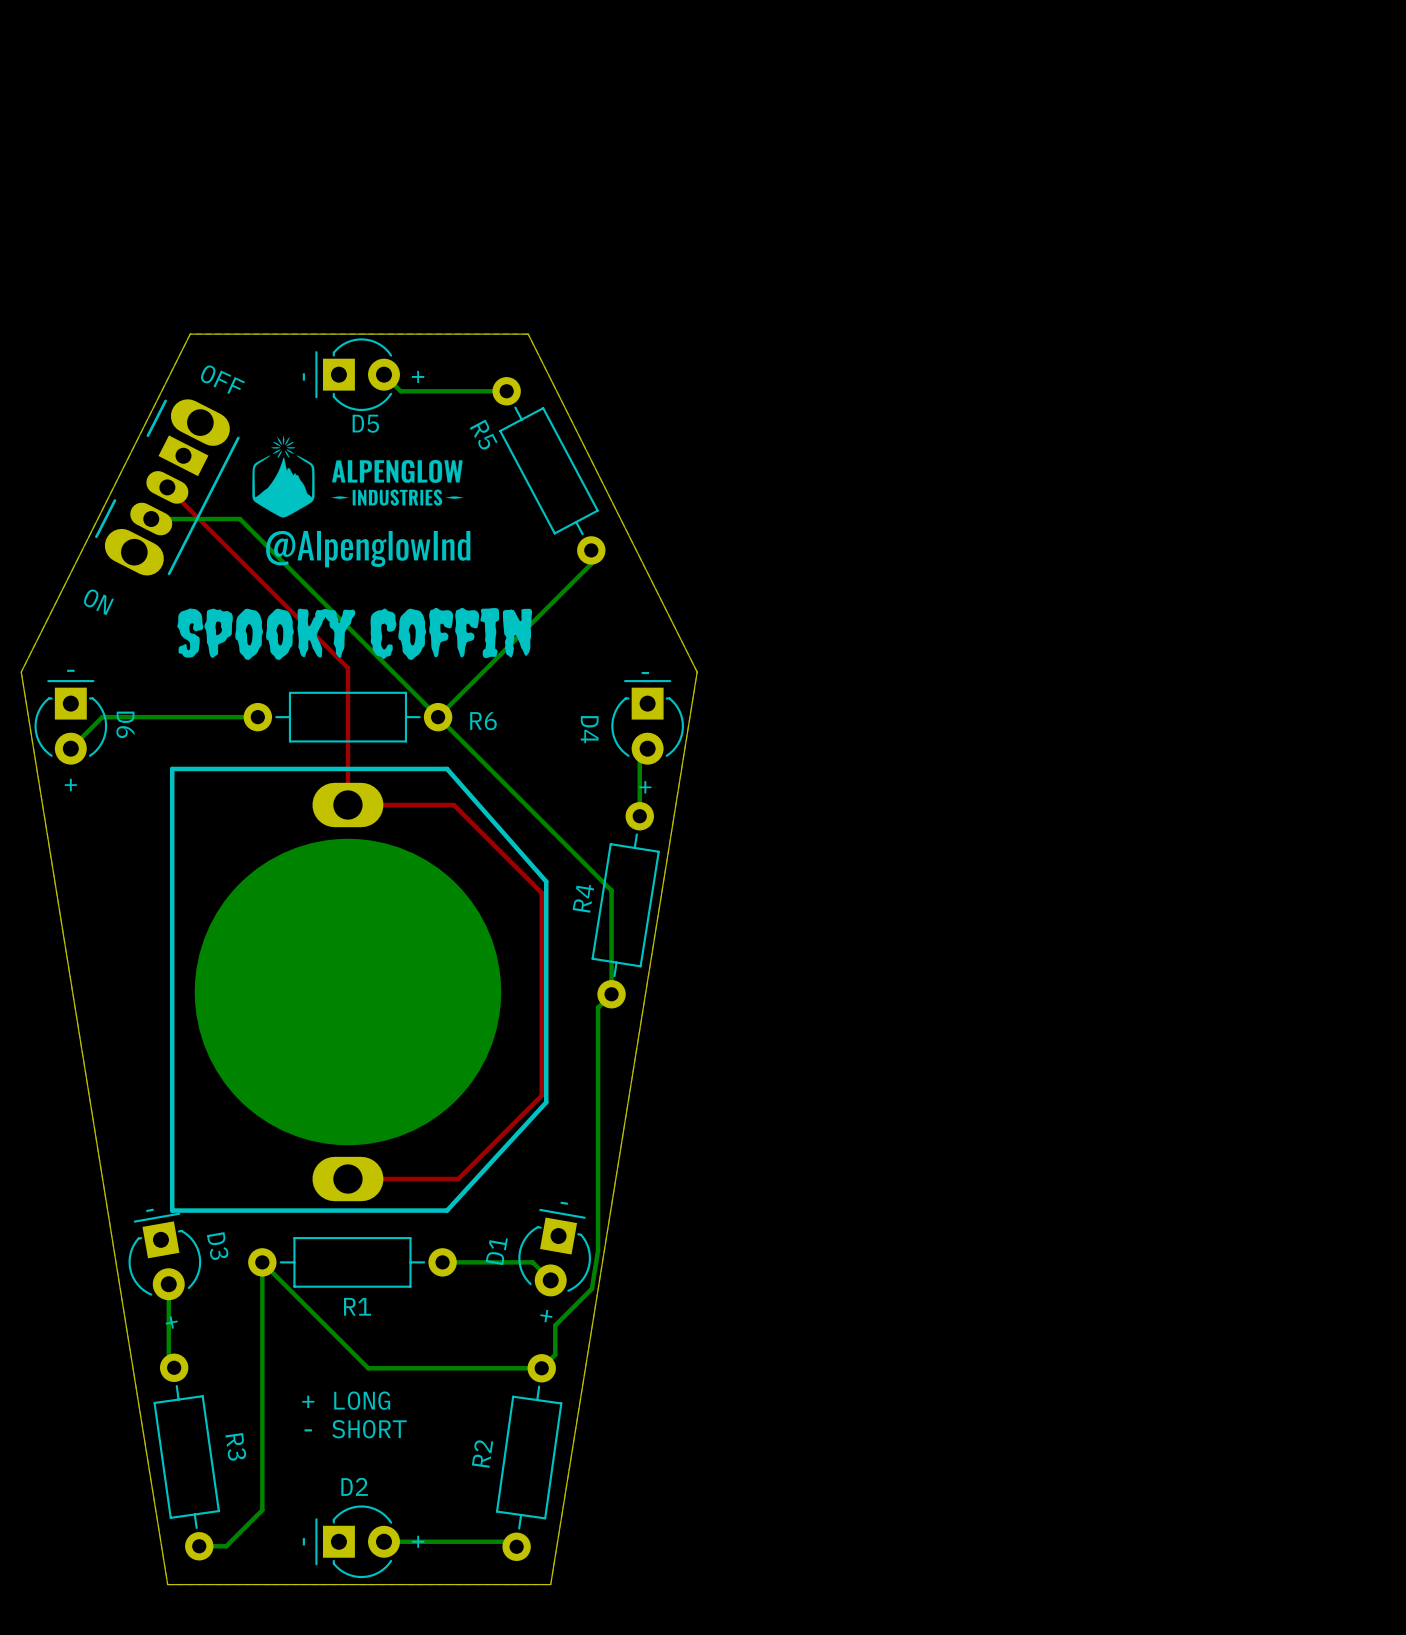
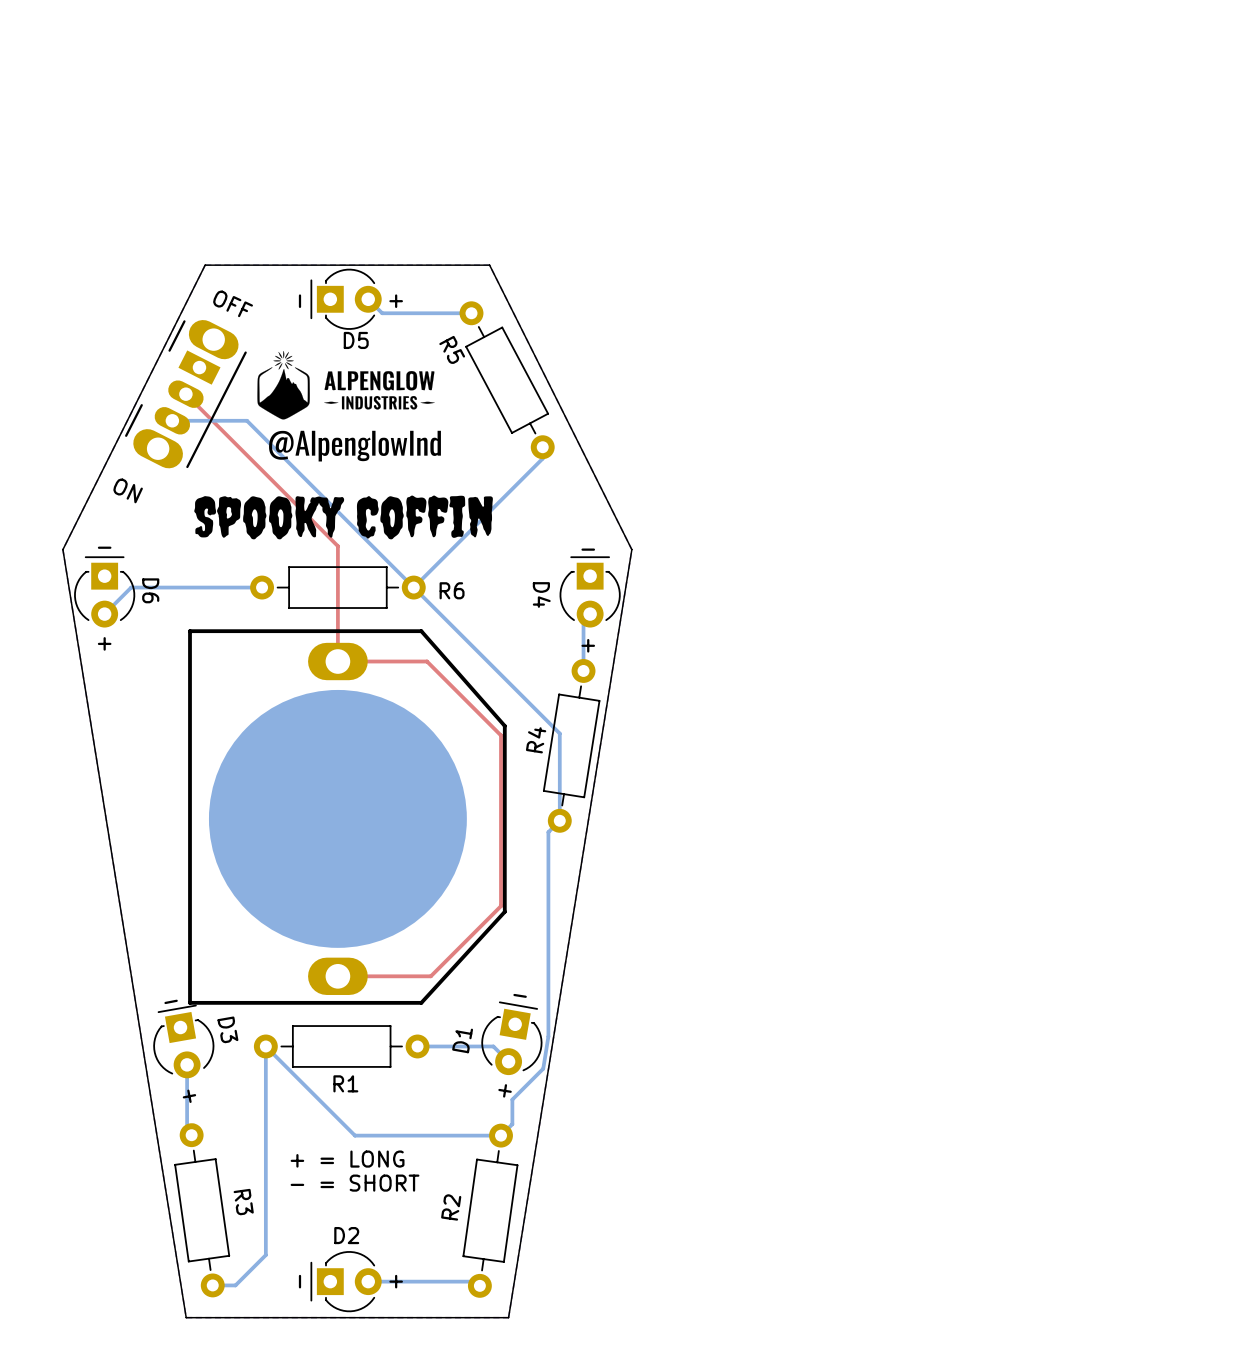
text: + LONG (346, 1400) -> + = LONG (347, 1159)
text: - SHORT (355, 1429) -> - = SHORT (355, 1183)

